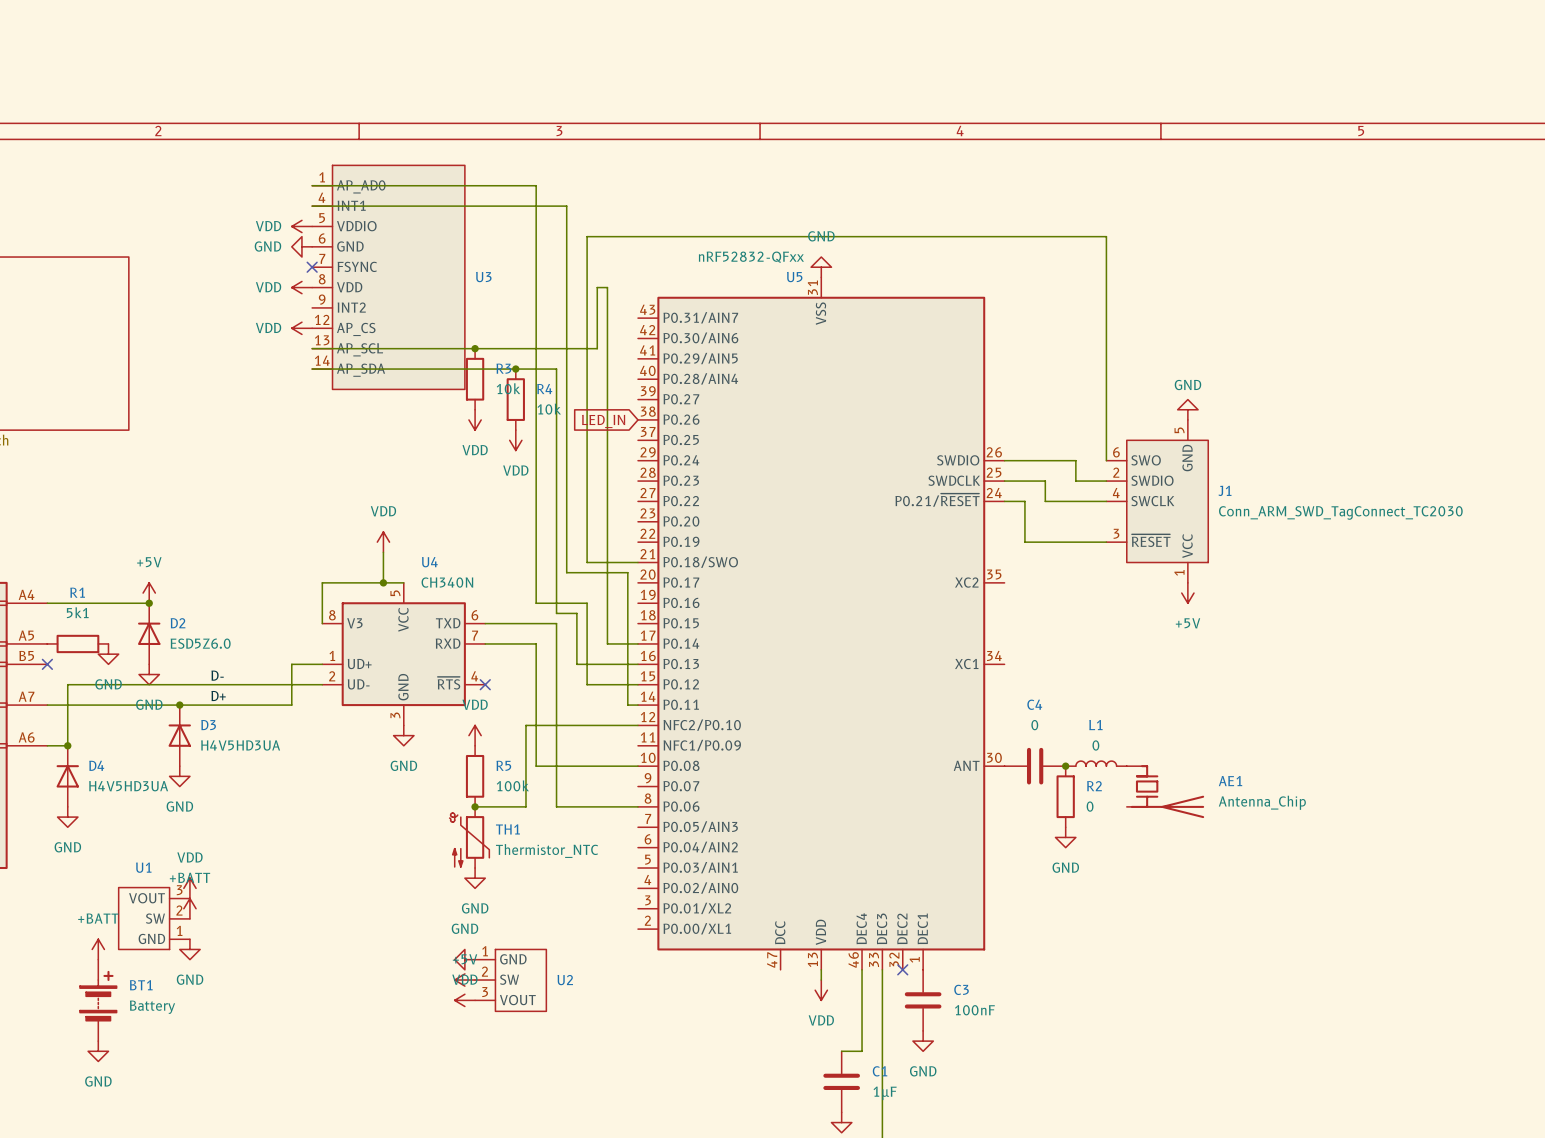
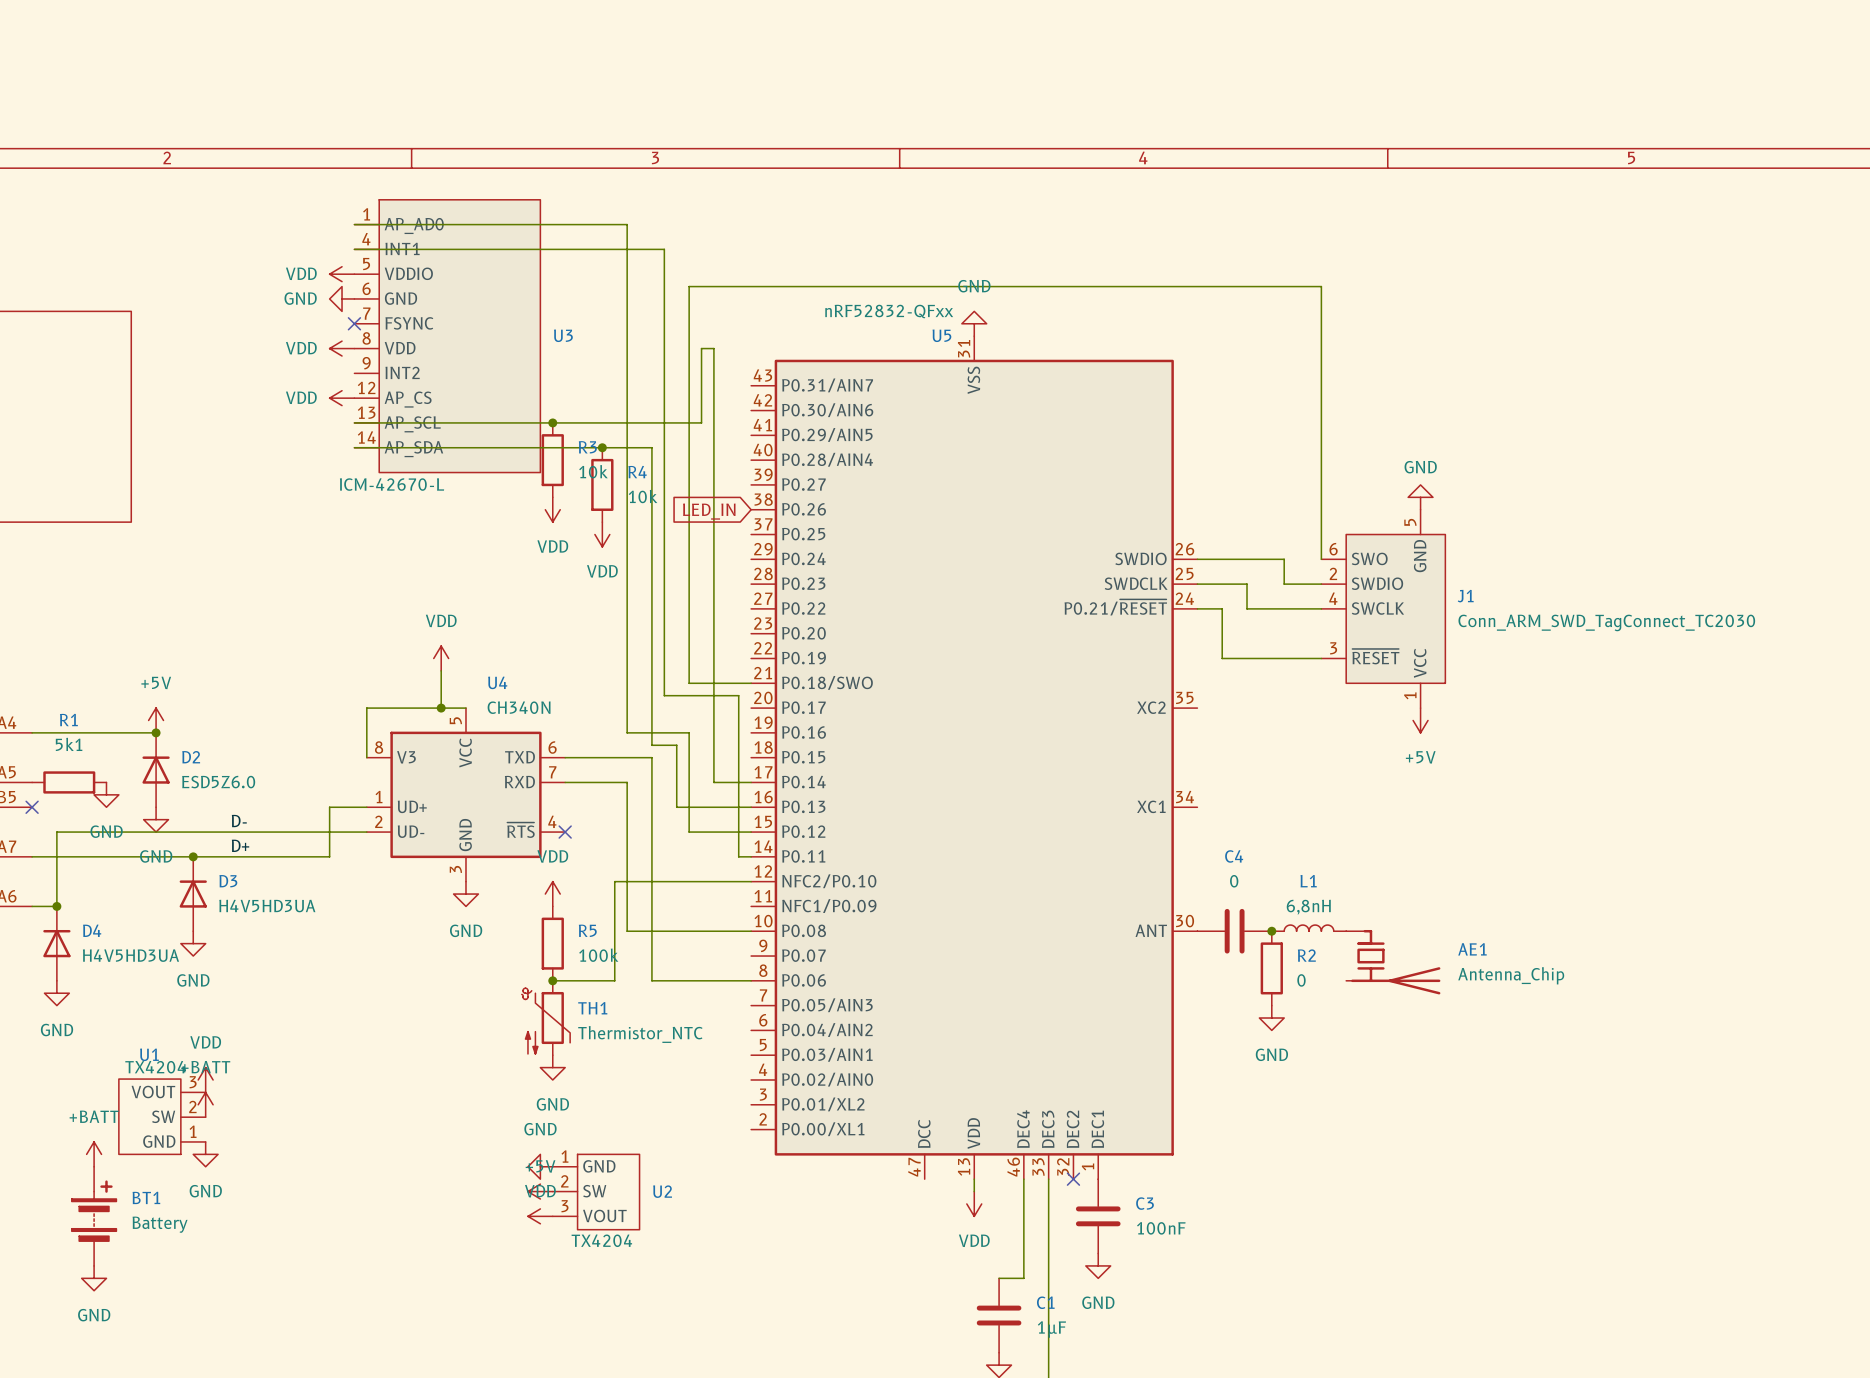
U3 value: none -> ICM-42670-L (392, 484)
L1 value: 0 (1095, 745) -> 6,8nH (1308, 907)
U1 value: none -> TX4204 (155, 1067)
U2 value: none -> TX4204 (601, 1240)

